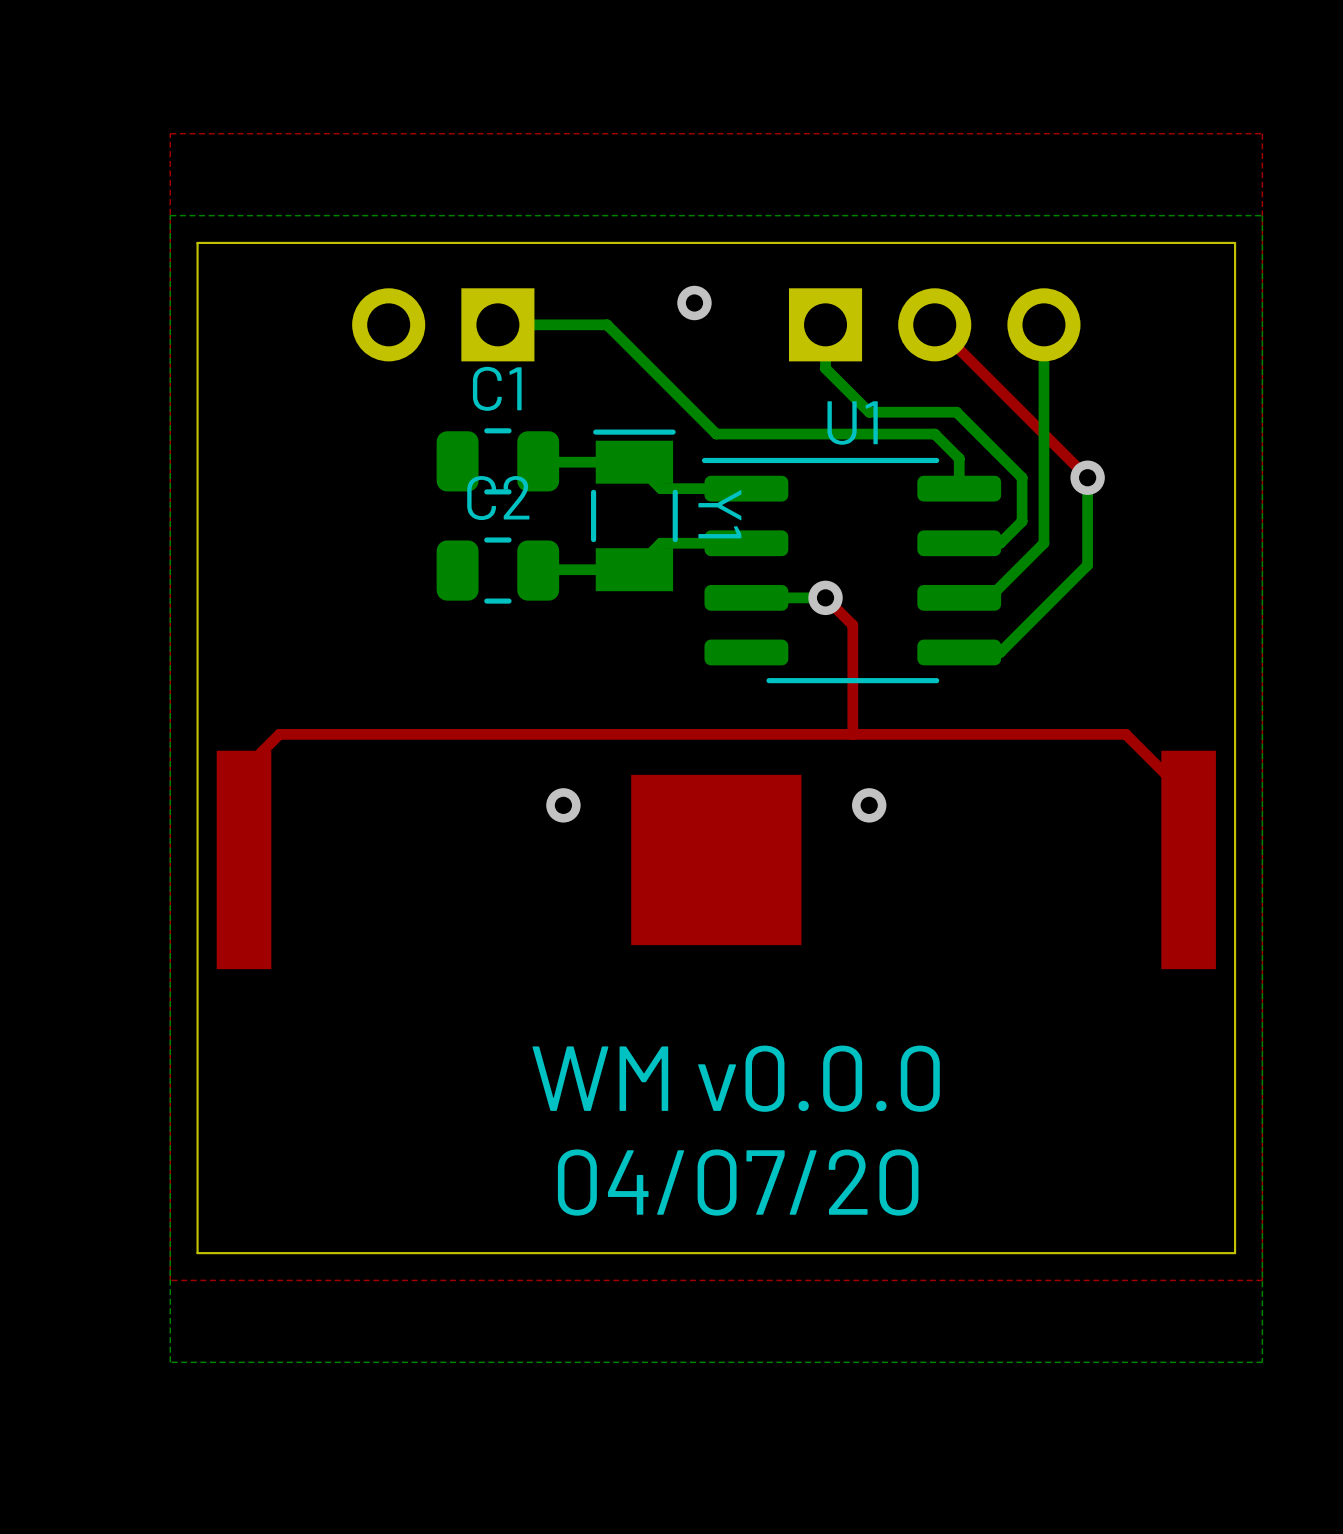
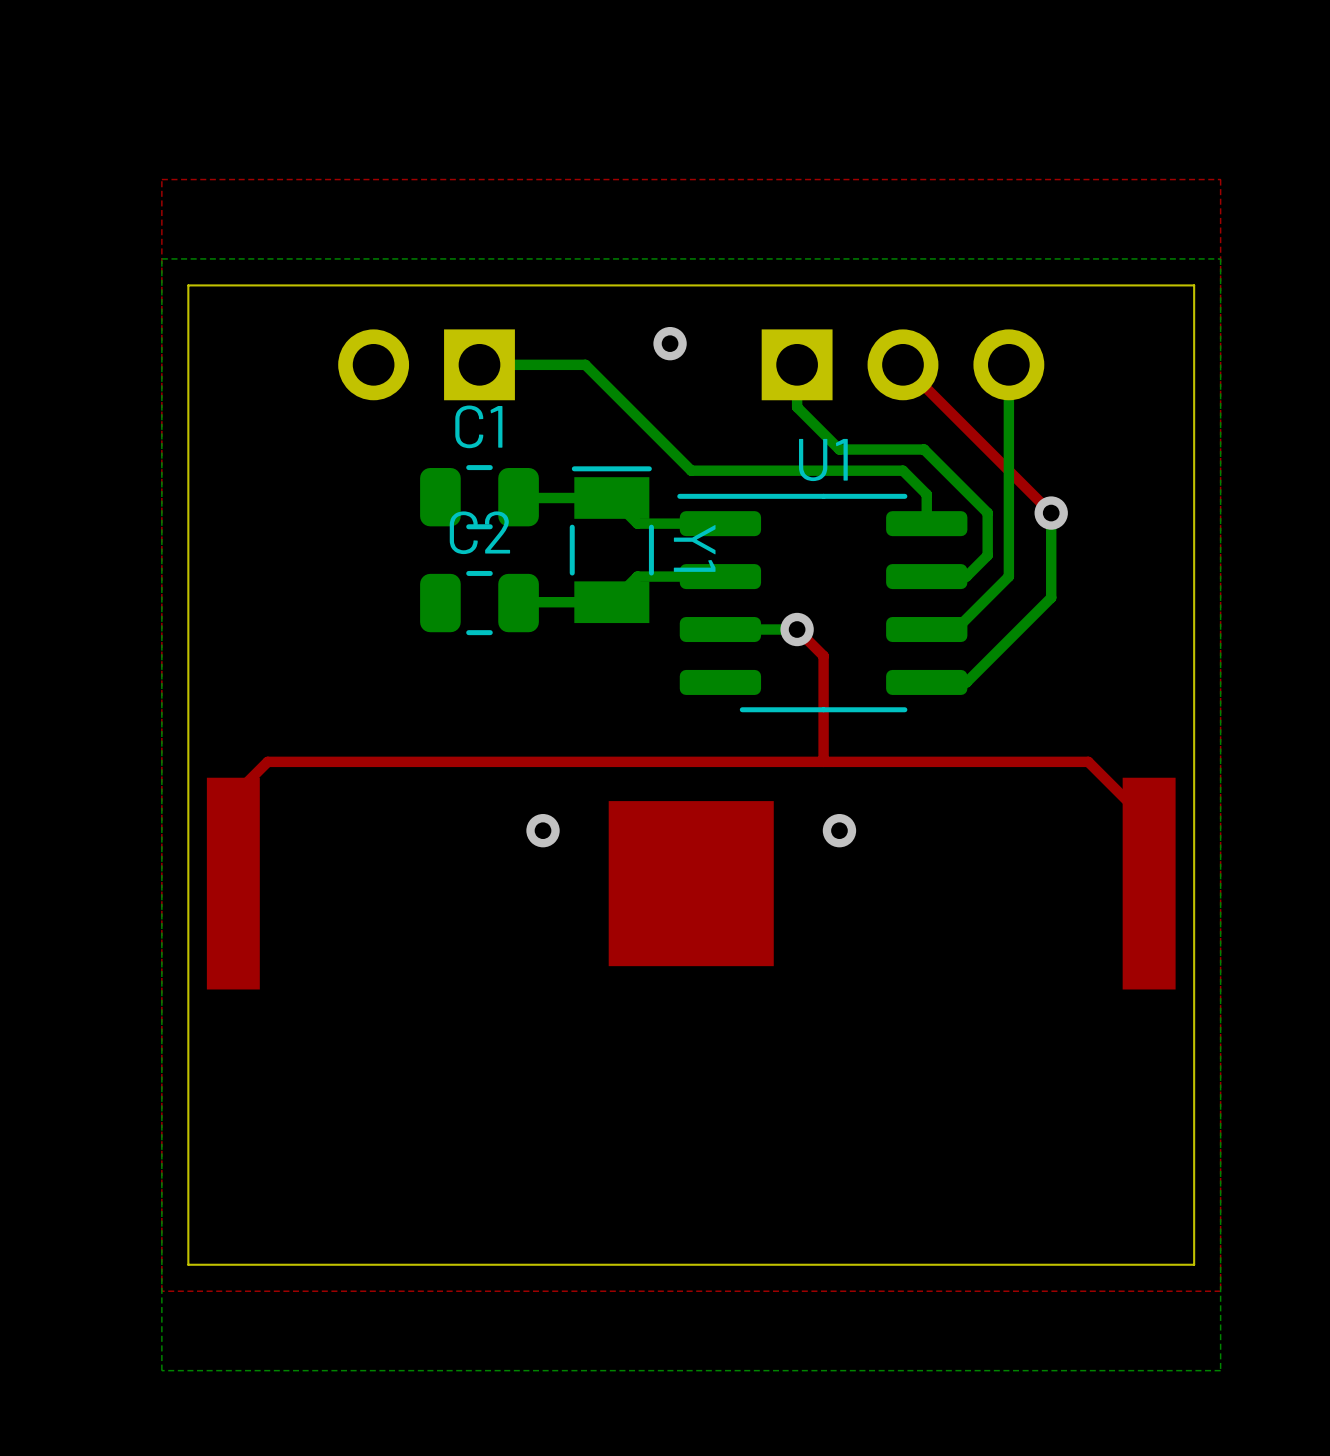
text: WM v0.0.0 (736, 1078) -> none
text: 04/07/20 (738, 1182) -> none

